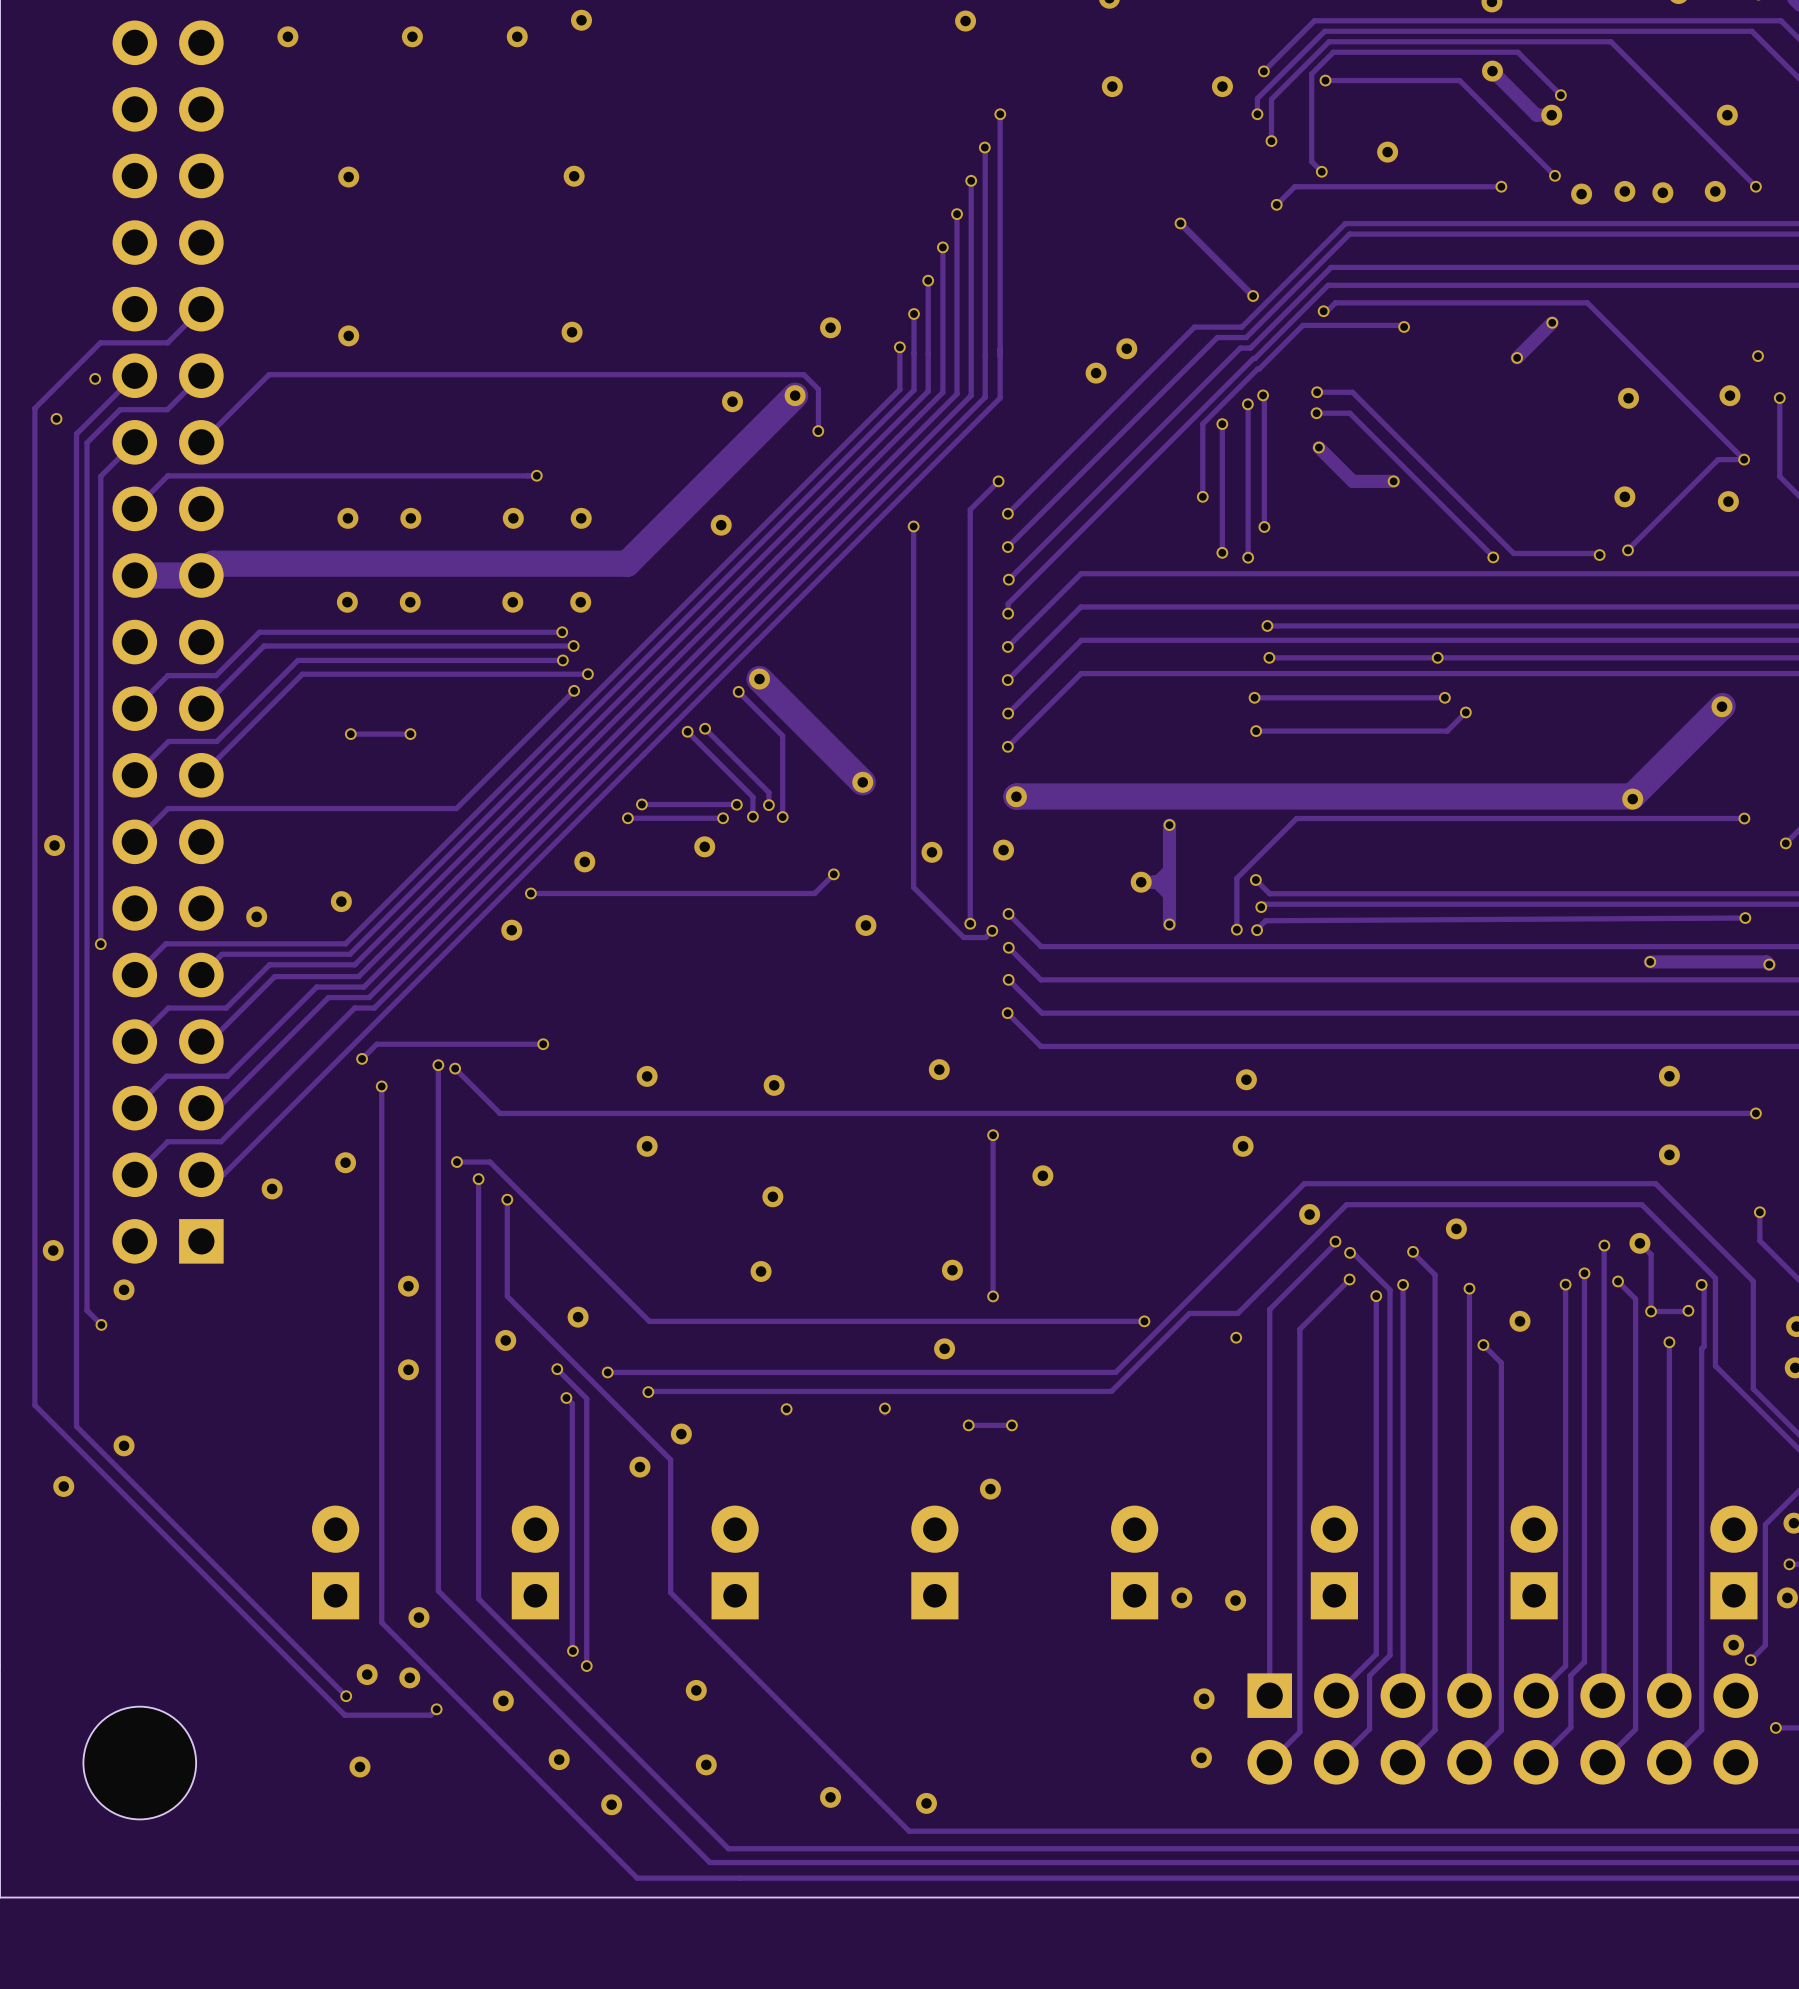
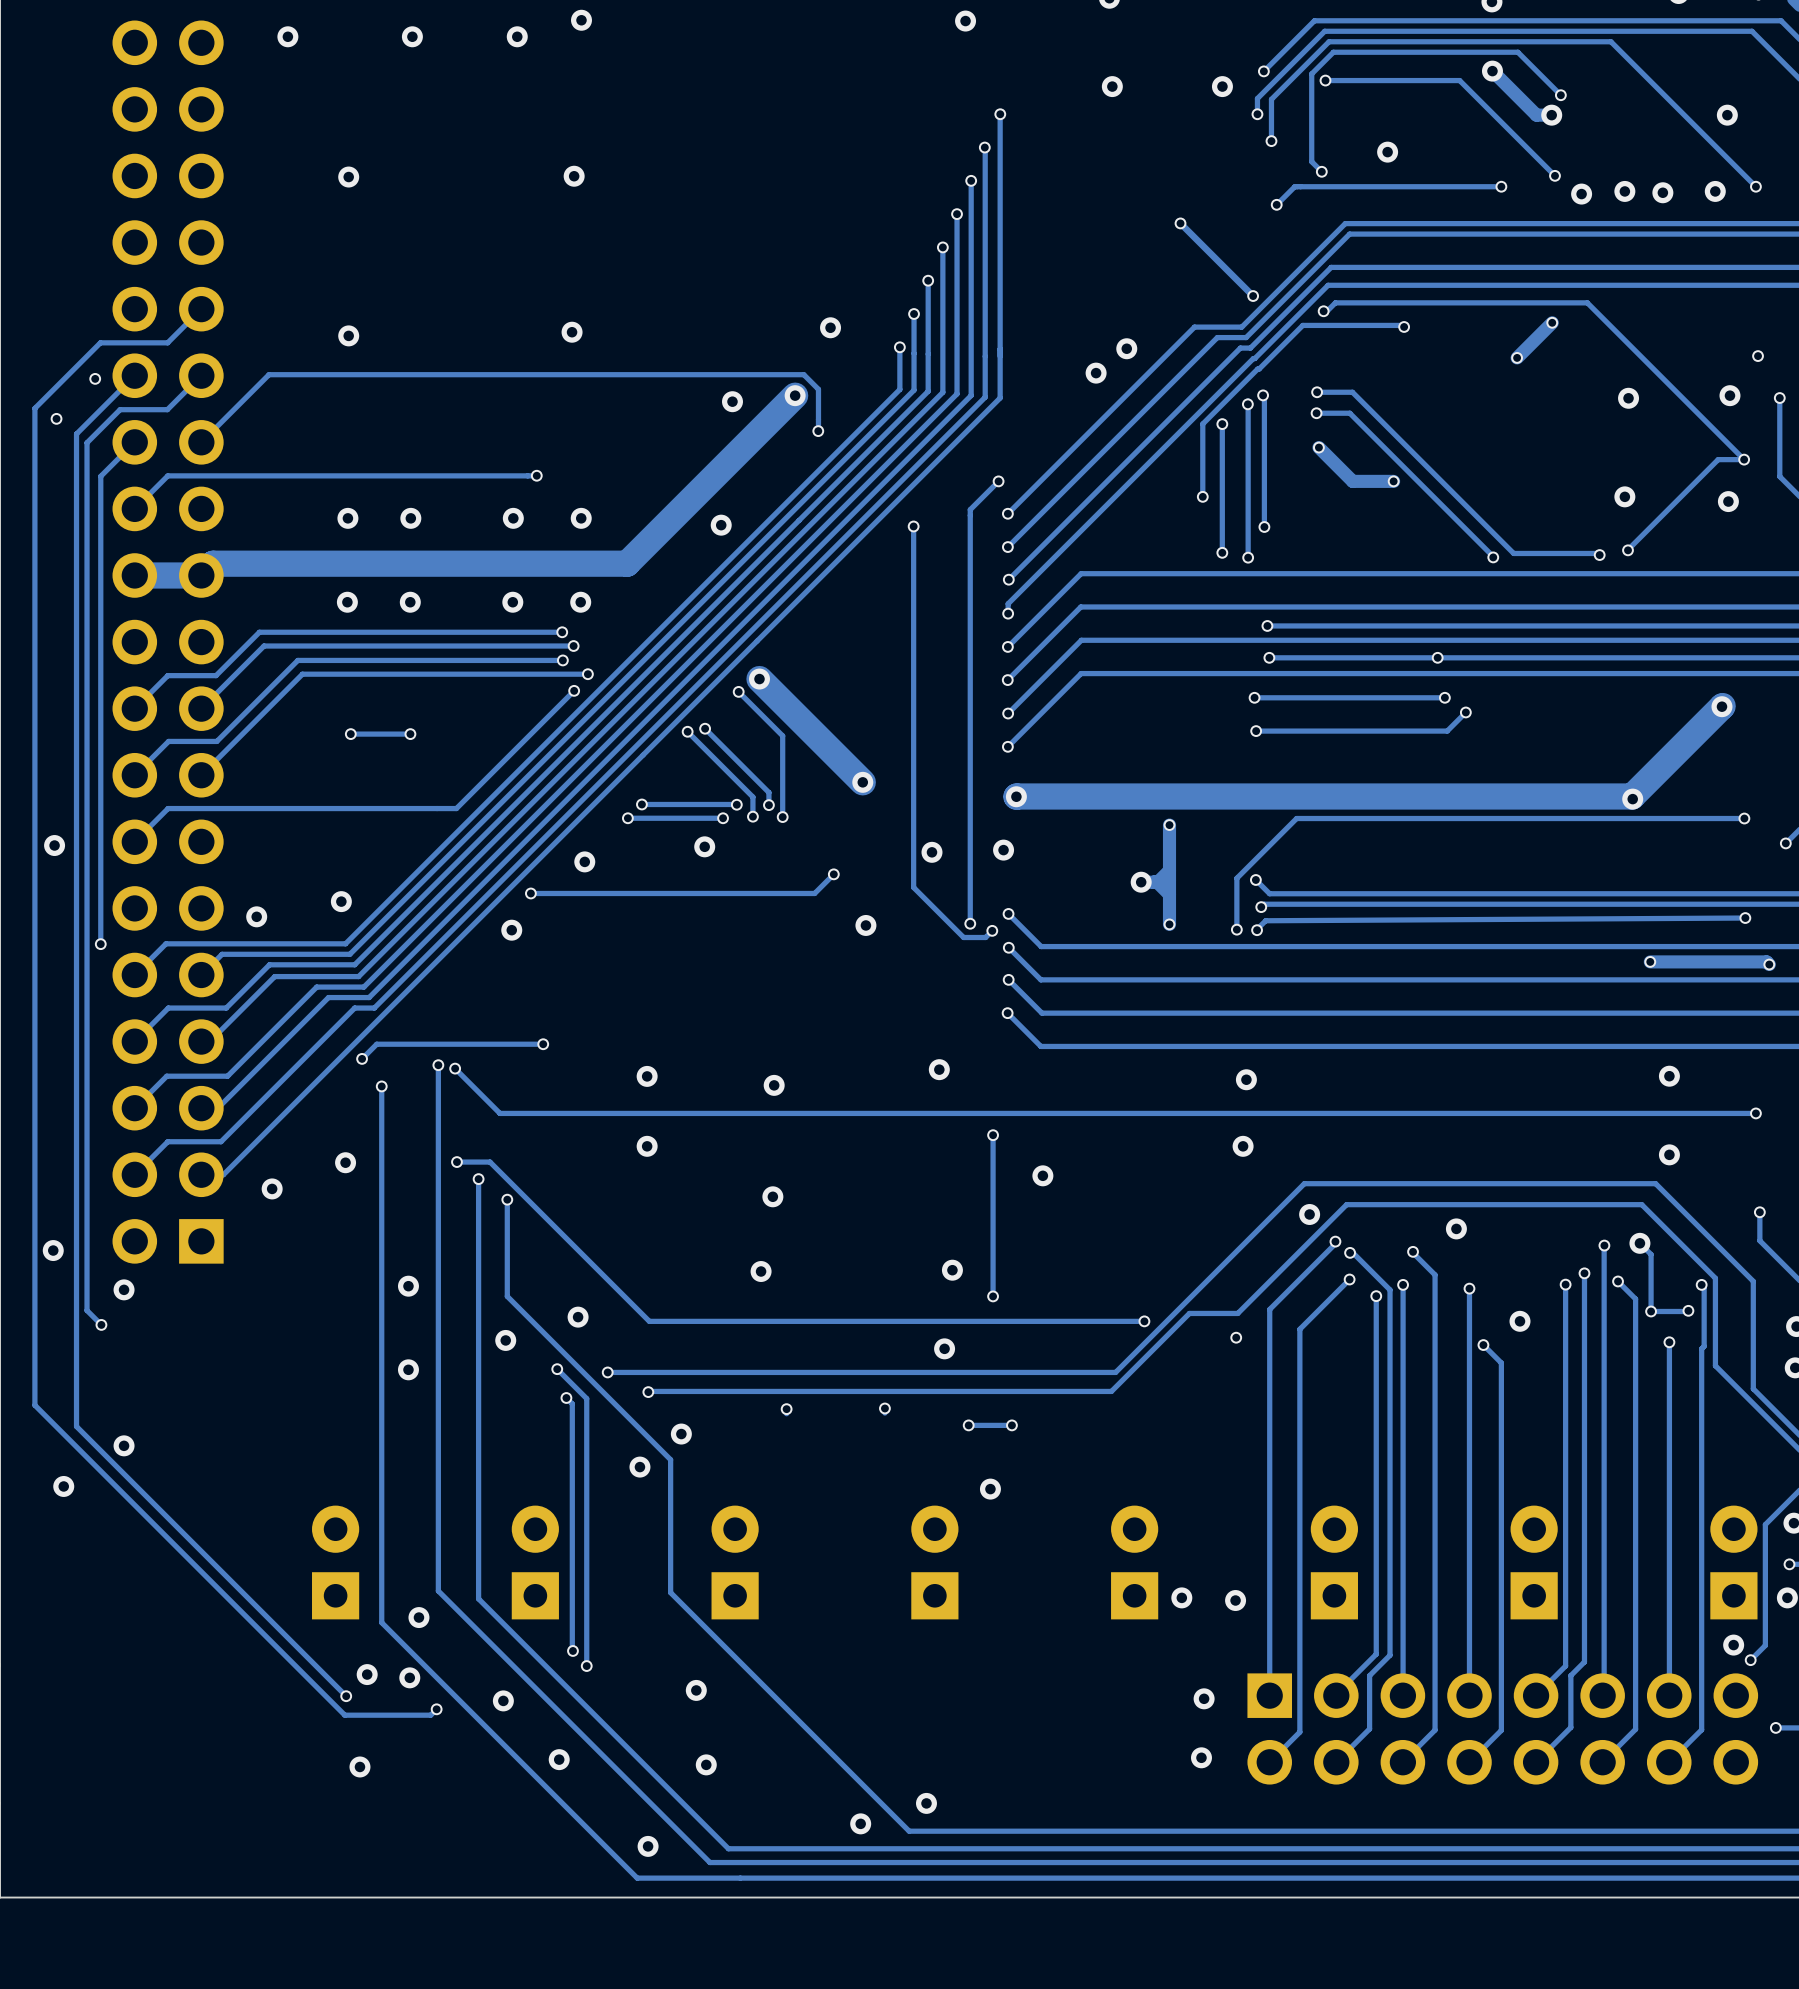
part: (139, 1763) -> none
via position: (830, 1797) -> (860, 1823)
via position: (611, 1804) -> (648, 1846)

